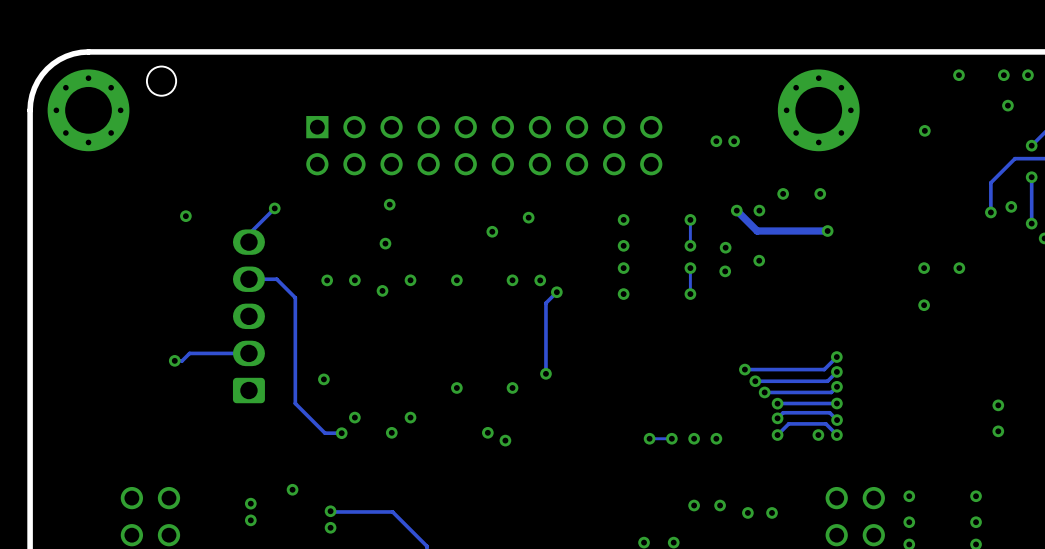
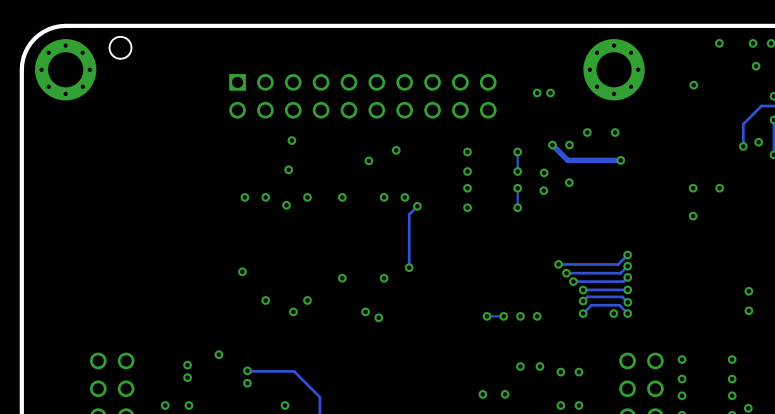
track: (274, 208) (248, 234) (248, 242) -> none
via: (274, 208) -> none
via: (185, 216) -> none
track: (248, 279) (276, 279) (295, 297) (295, 403) (325, 433) (341, 433) -> none
part: (248, 316) -> none
track: (248, 353) (189, 353) (182, 360) (174, 360) -> none
via: (174, 360) -> none
via: (341, 433) -> none

